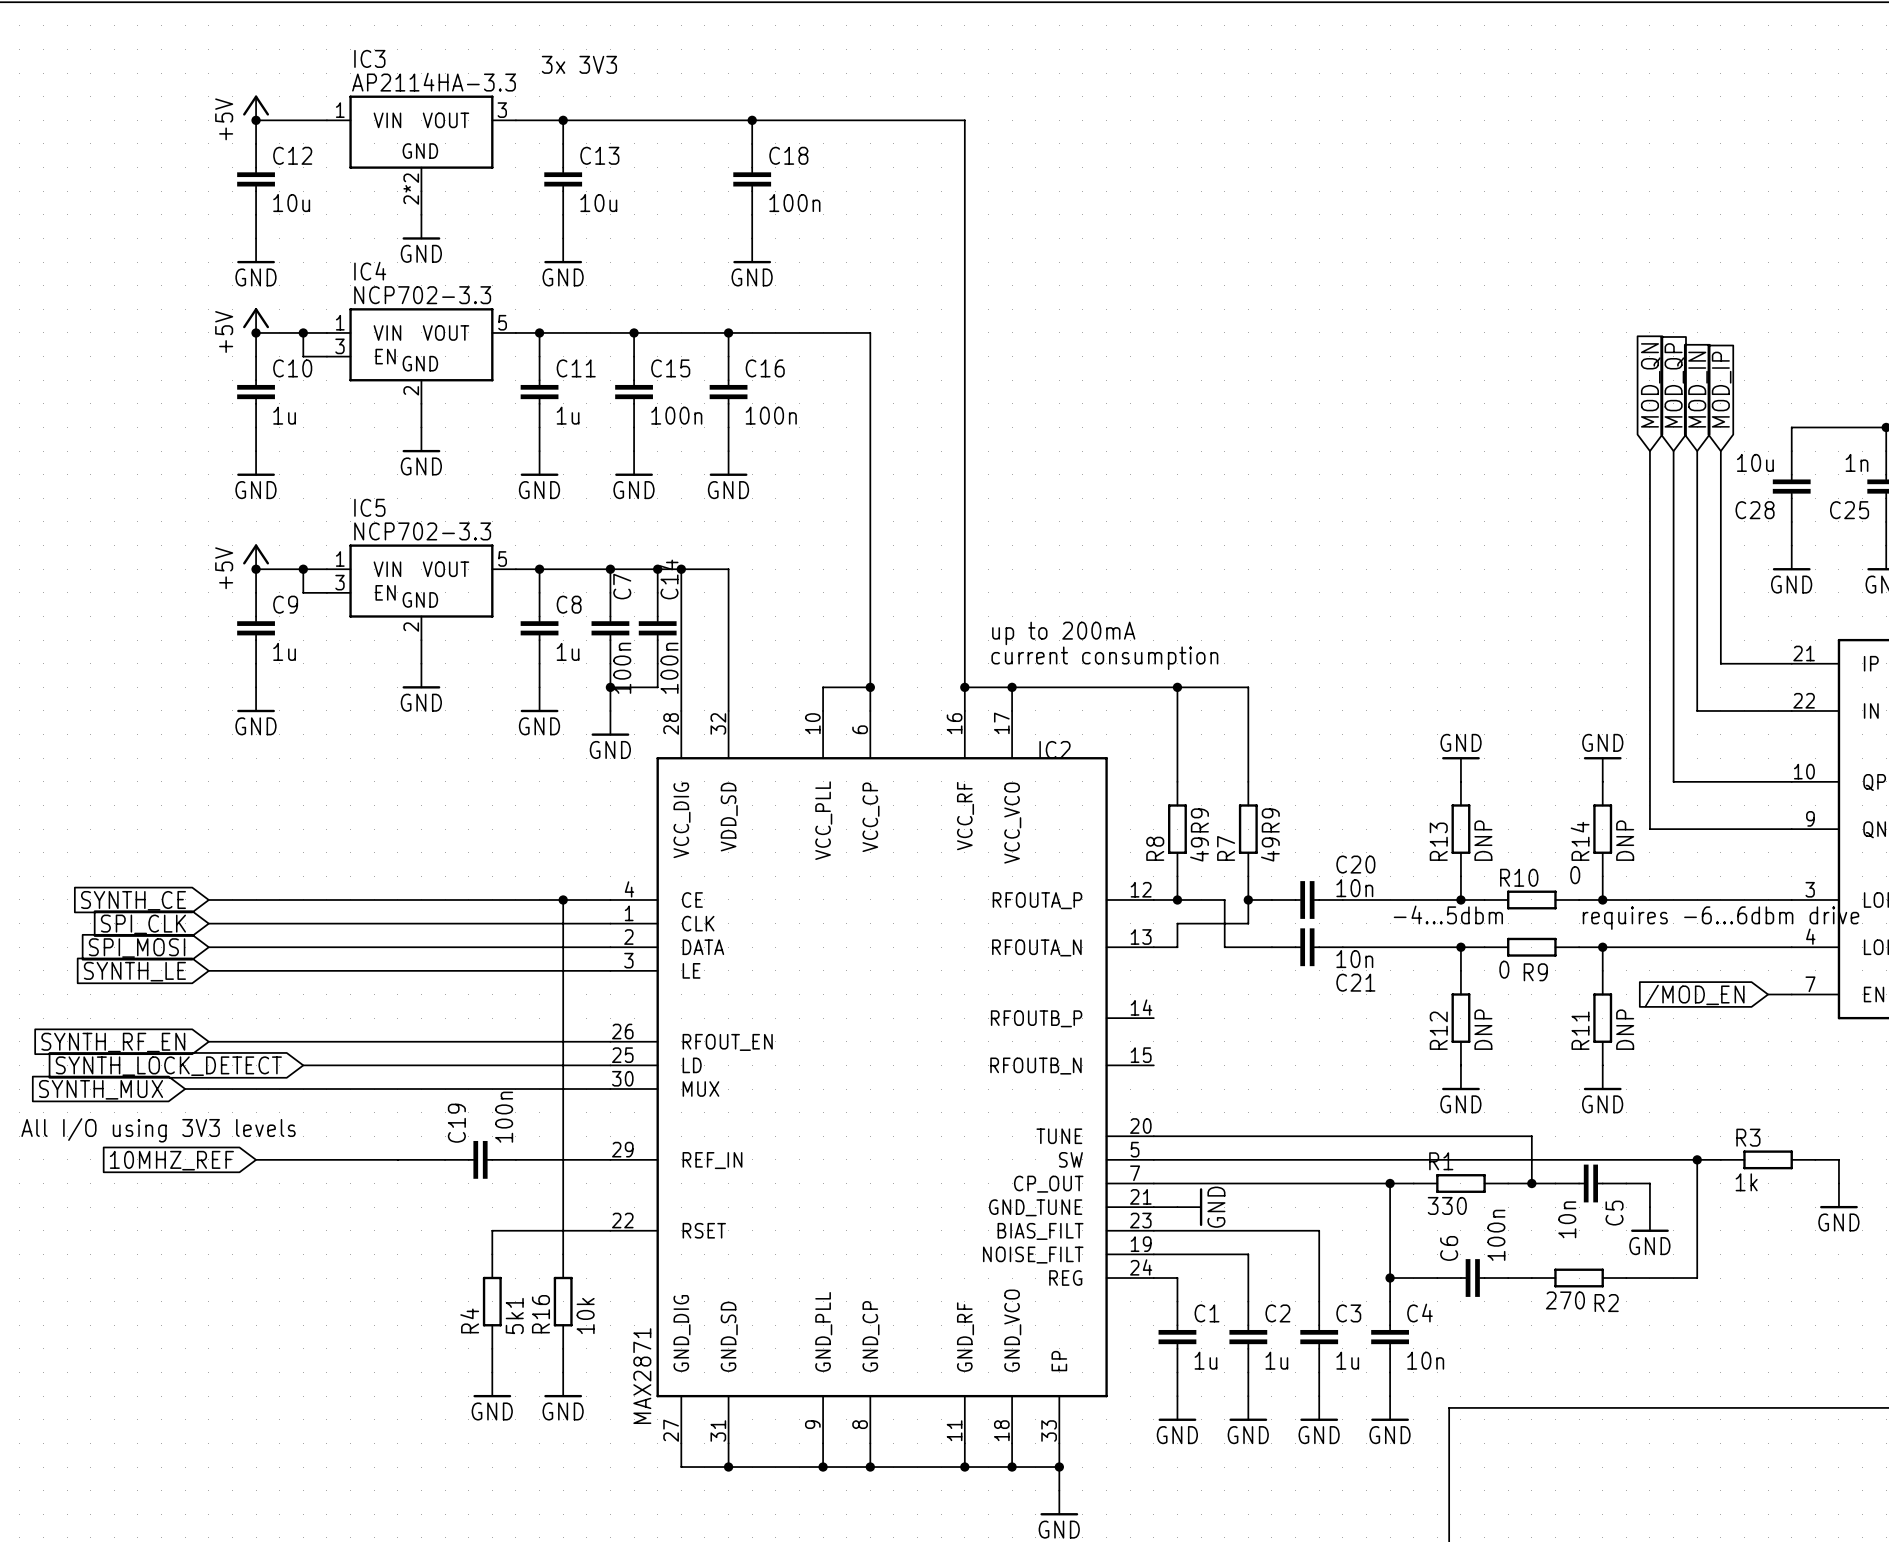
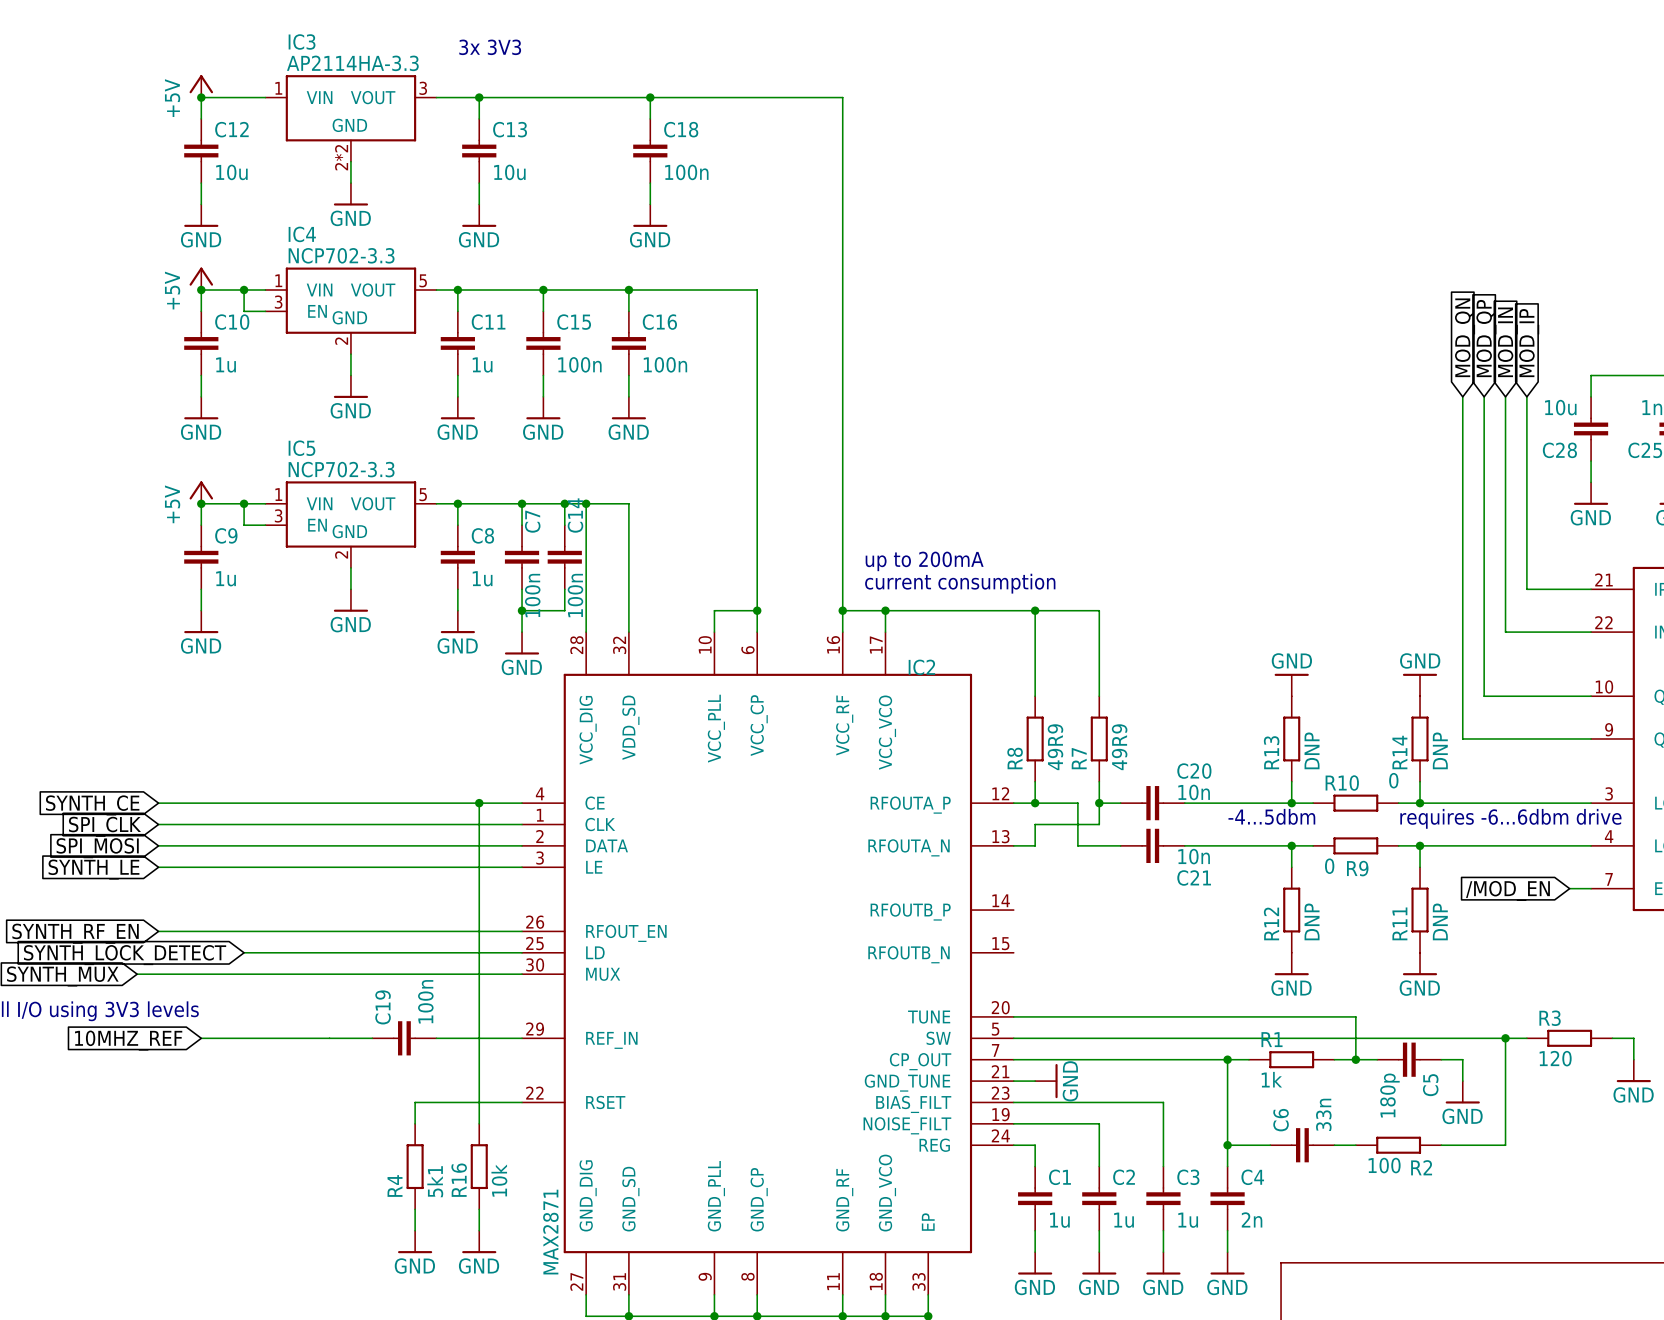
R3 value: 1k (1746, 1182) -> 120 (1555, 1058)
R1 value: 330 (1447, 1205) -> 1k (1271, 1079)
C5 value: 10n (1567, 1219) -> 180p (1389, 1095)
C6 value: 100n (1496, 1235) -> 33n (1323, 1114)
R2 value: 270 (1565, 1300) -> 100 (1384, 1165)
C4 value: 10n (1425, 1360) -> 2n (1252, 1219)

